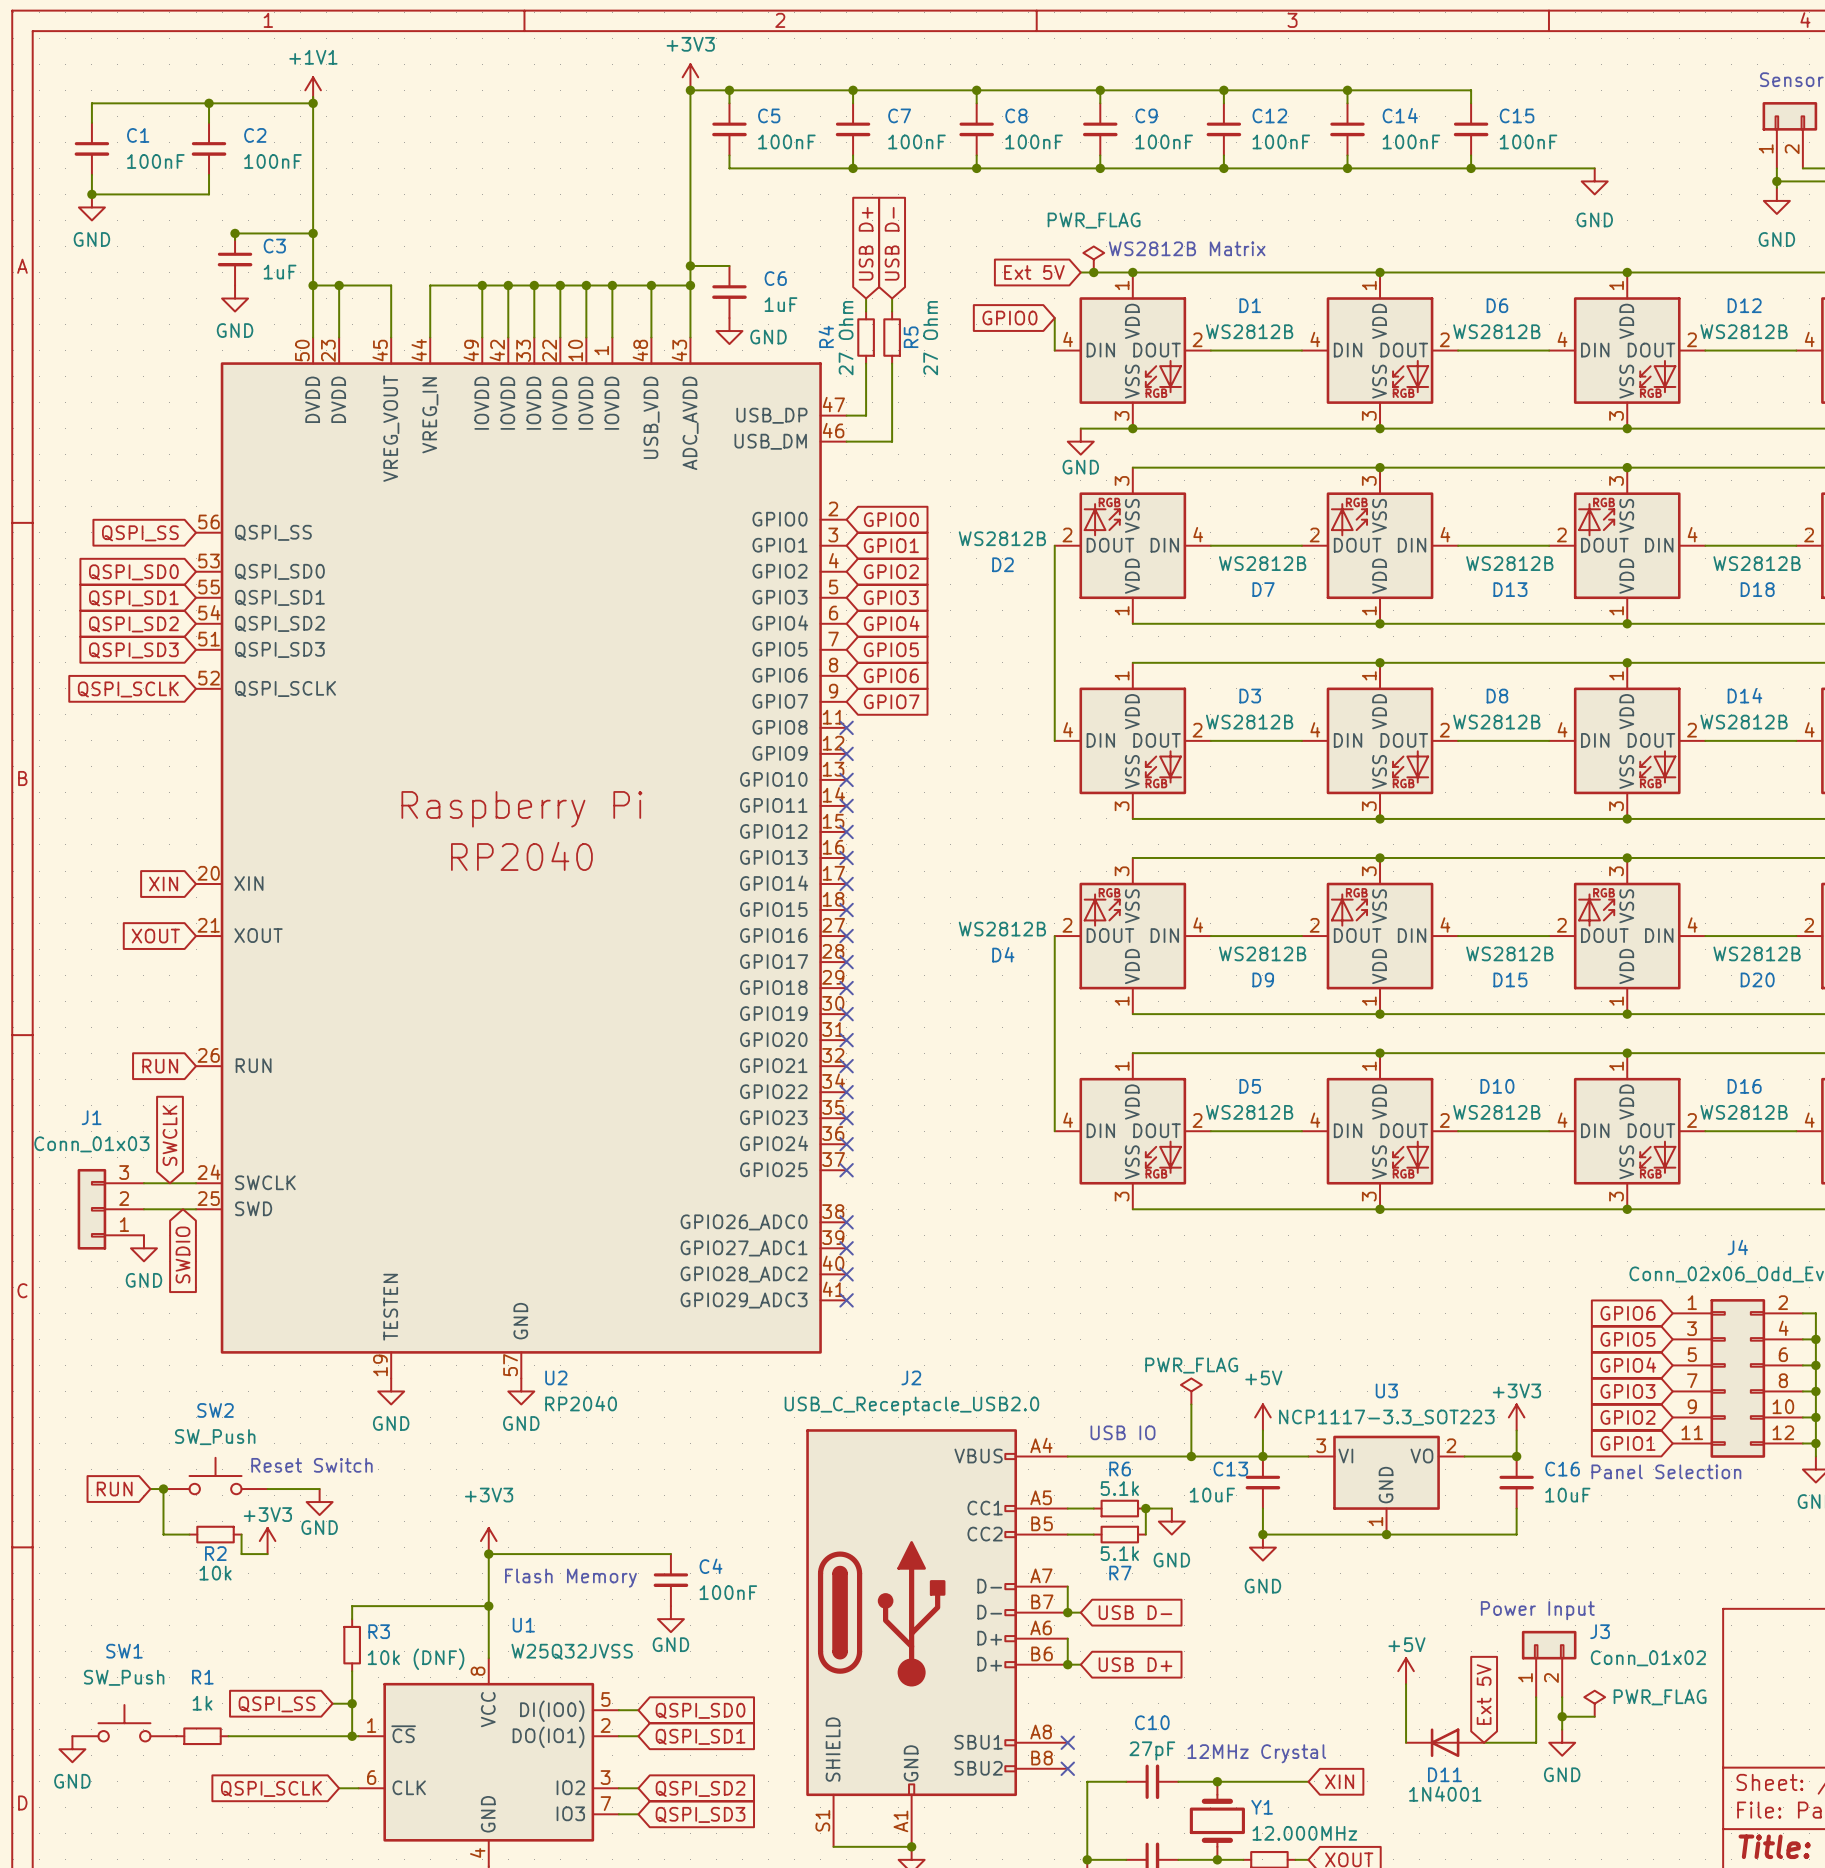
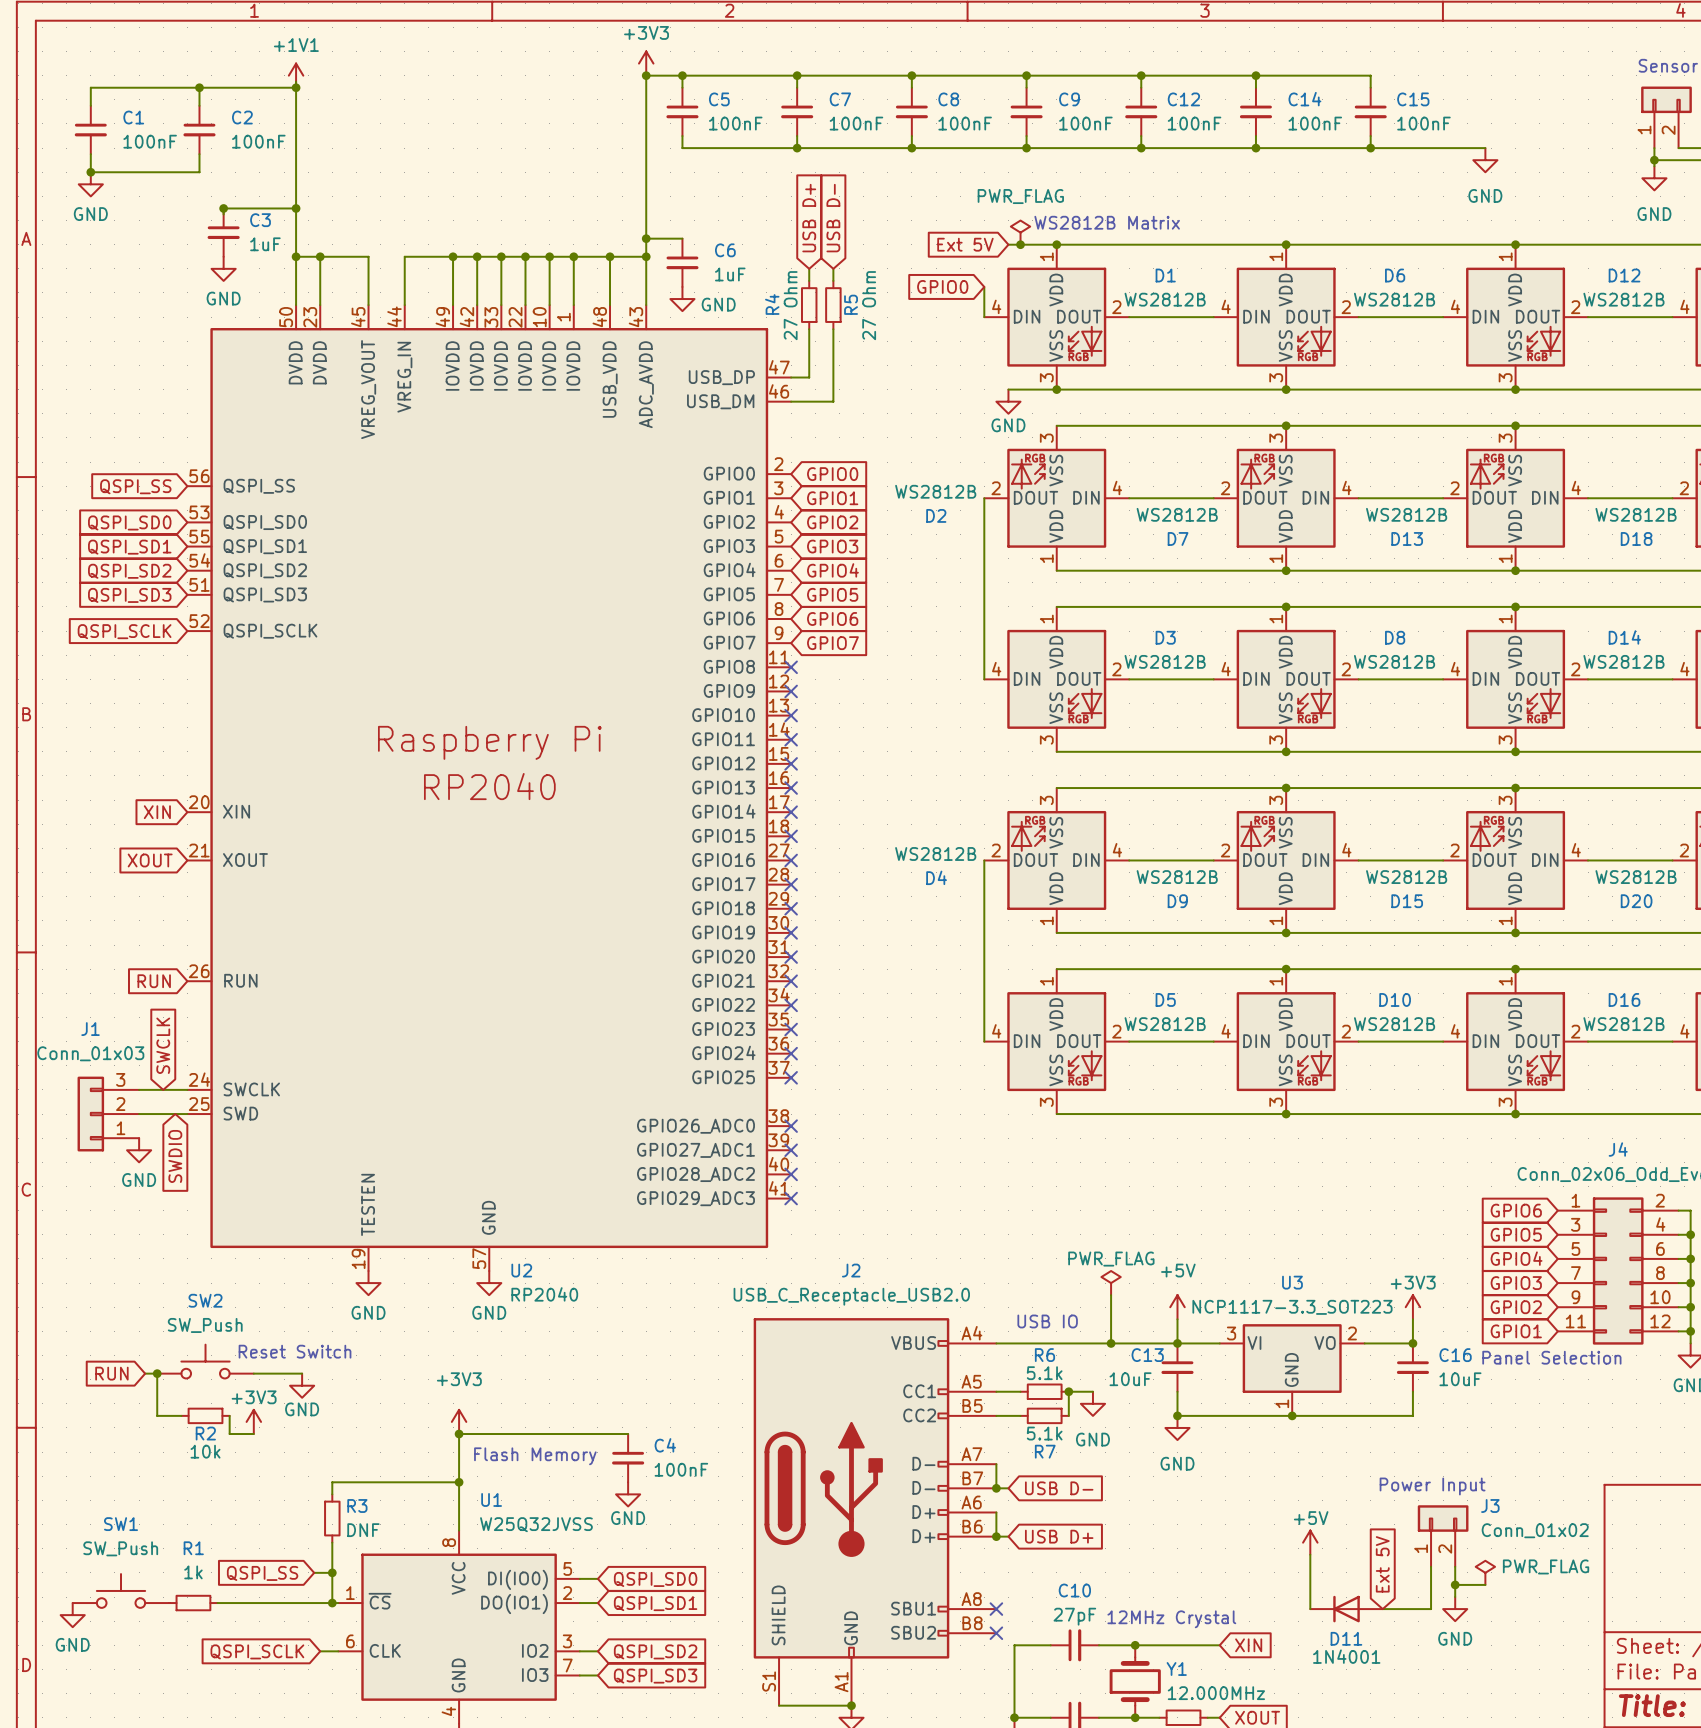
R3 value: 10k (DNF) (416, 1659) -> DNF (363, 1530)

